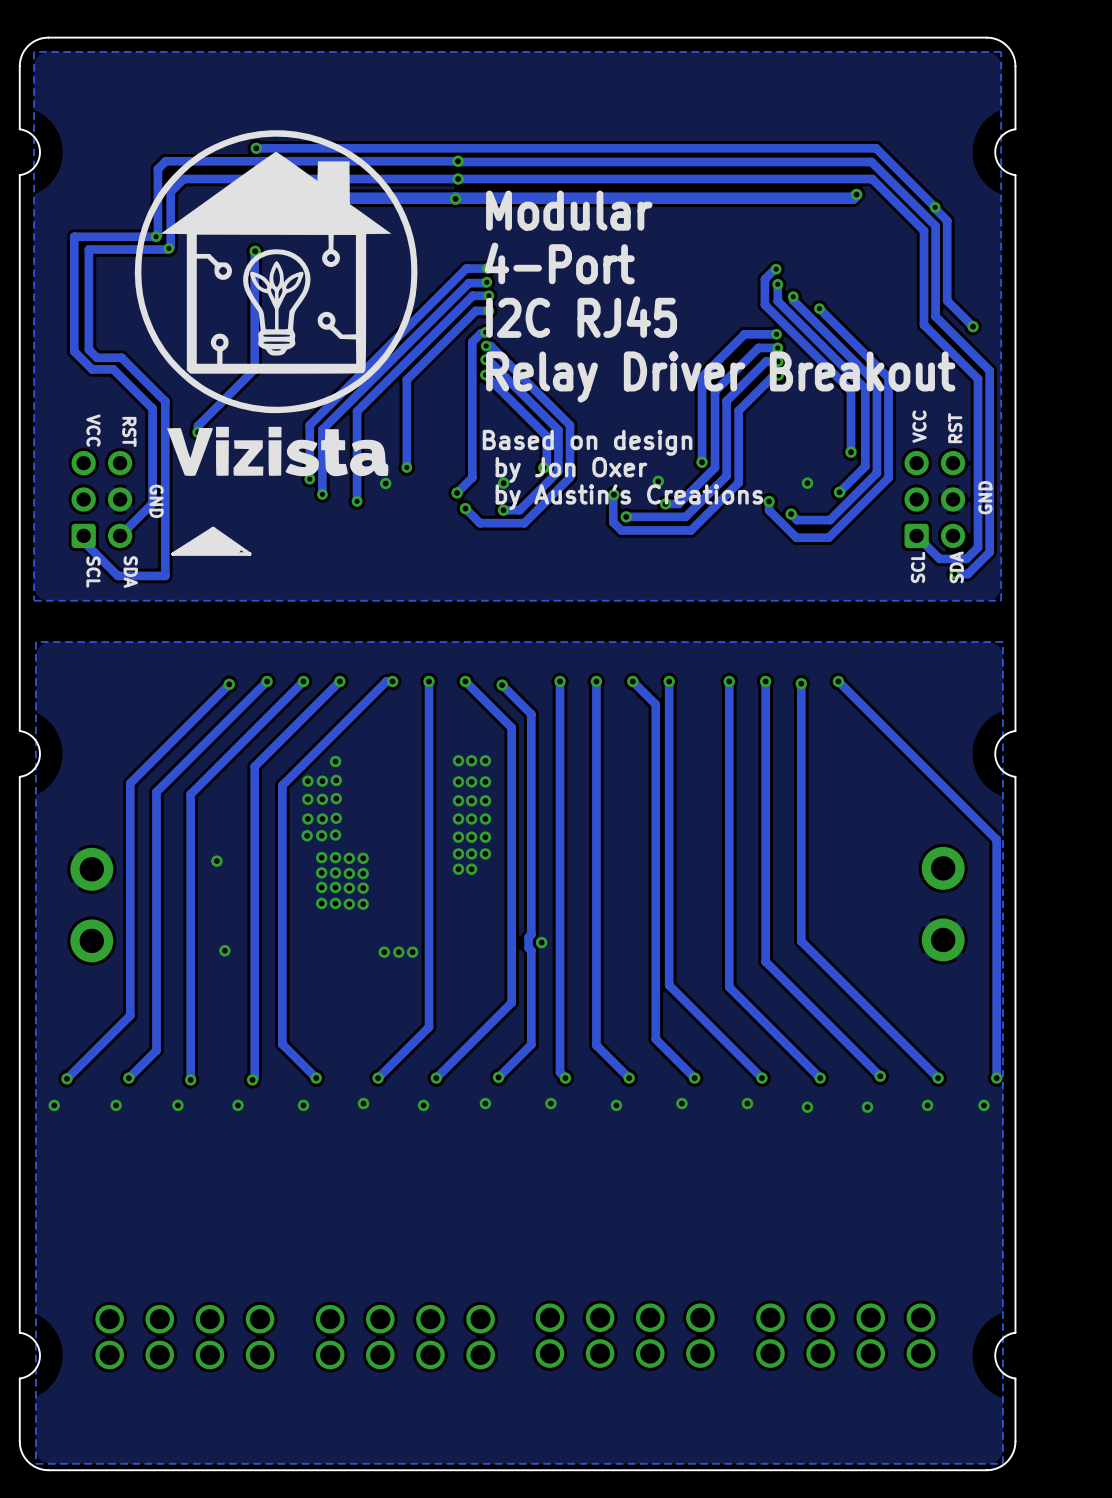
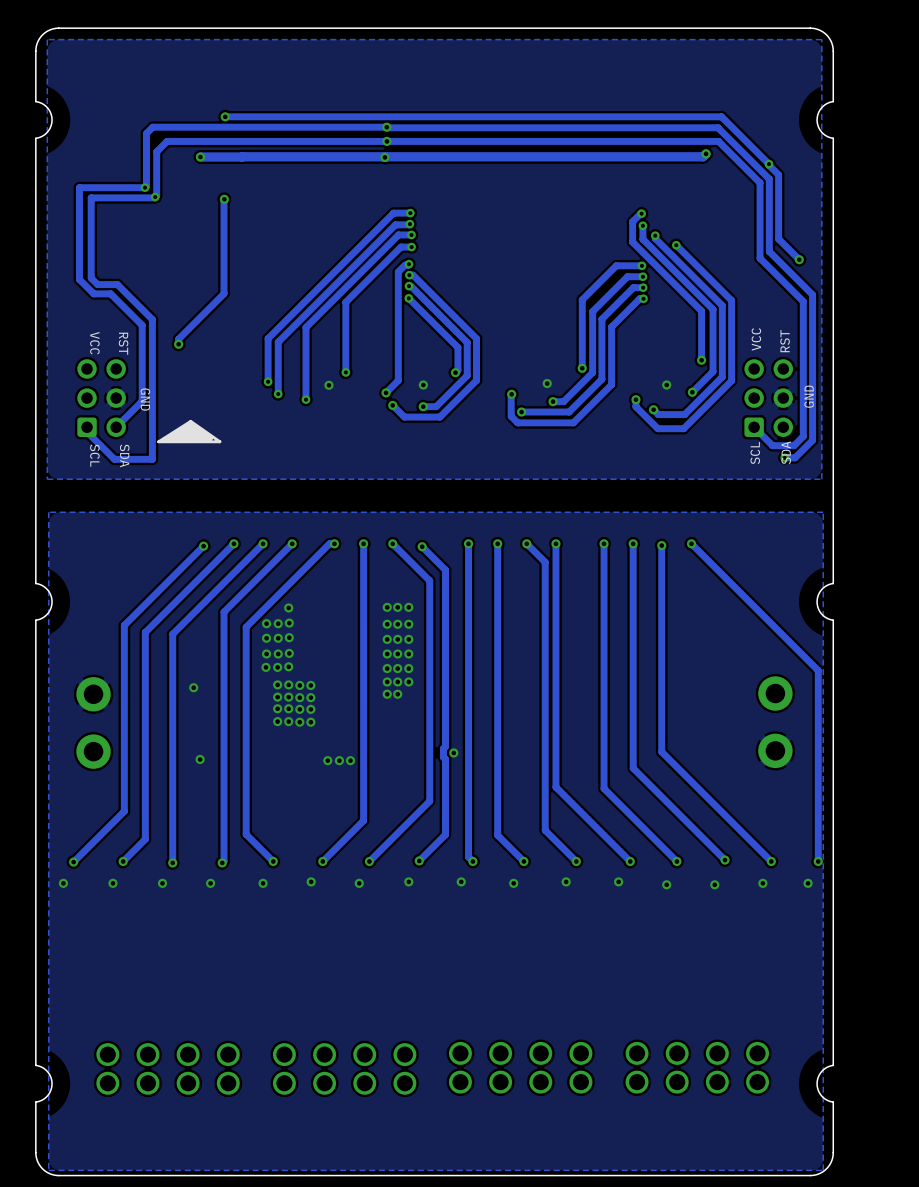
drawing: [134, 130, 418, 477] -> none
text: Modular (569, 210) -> none
text: 4-Port (559, 263) -> none
text: I2C RJ45 (581, 317) -> none
text: Relay Driver Breakout (720, 376) -> none
text: Based on design (587, 442) -> none
text: by Jon Oxer (571, 470) -> none
text: by Austin's Creations (629, 497) -> none

